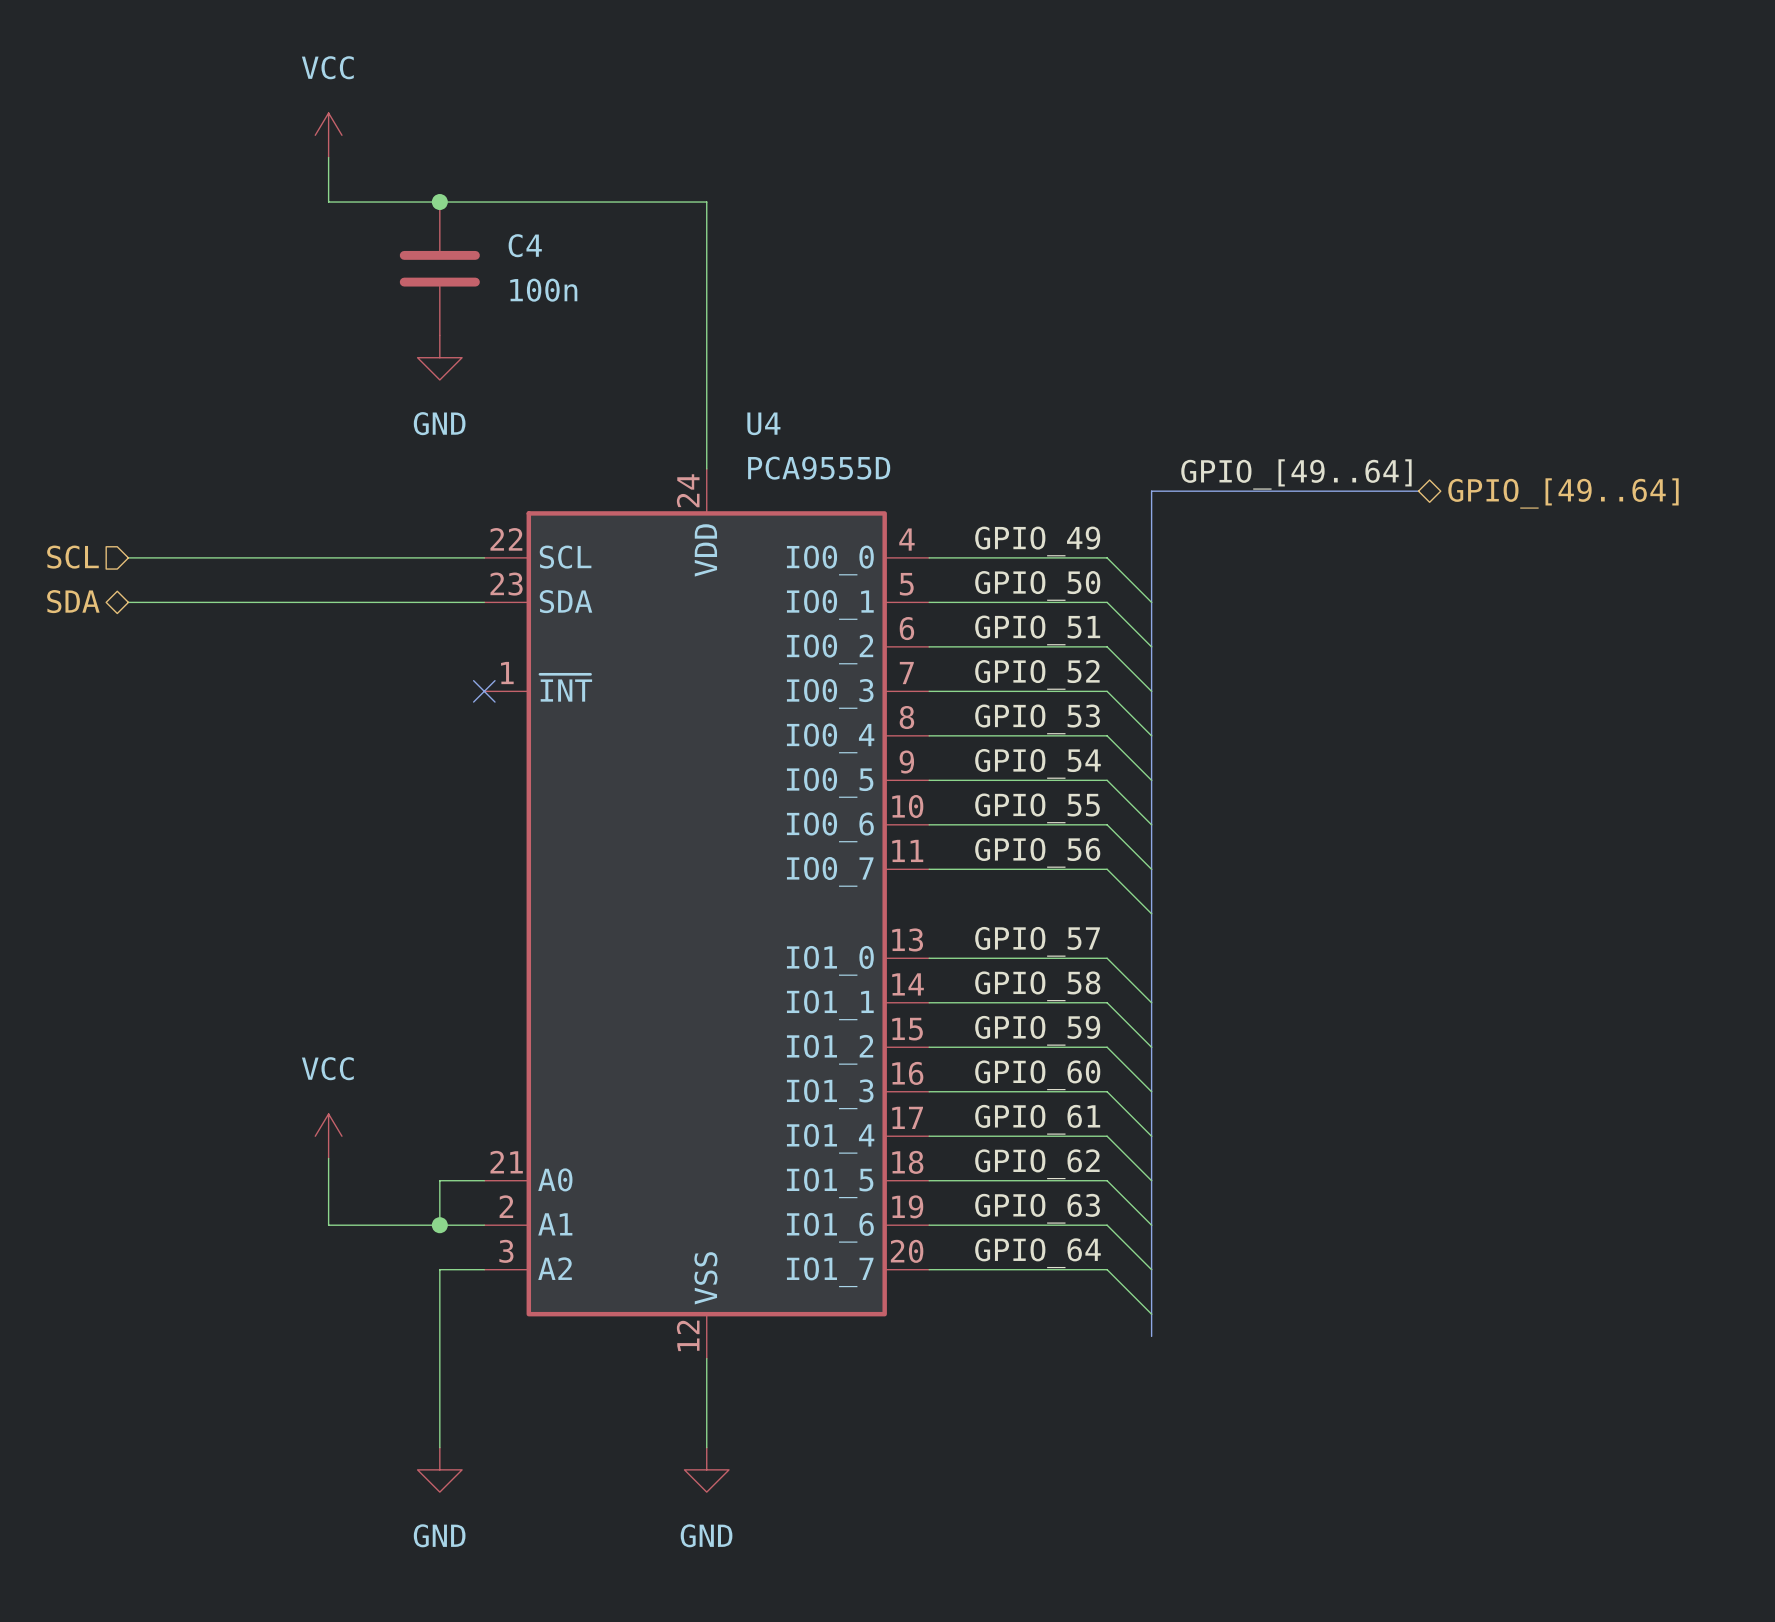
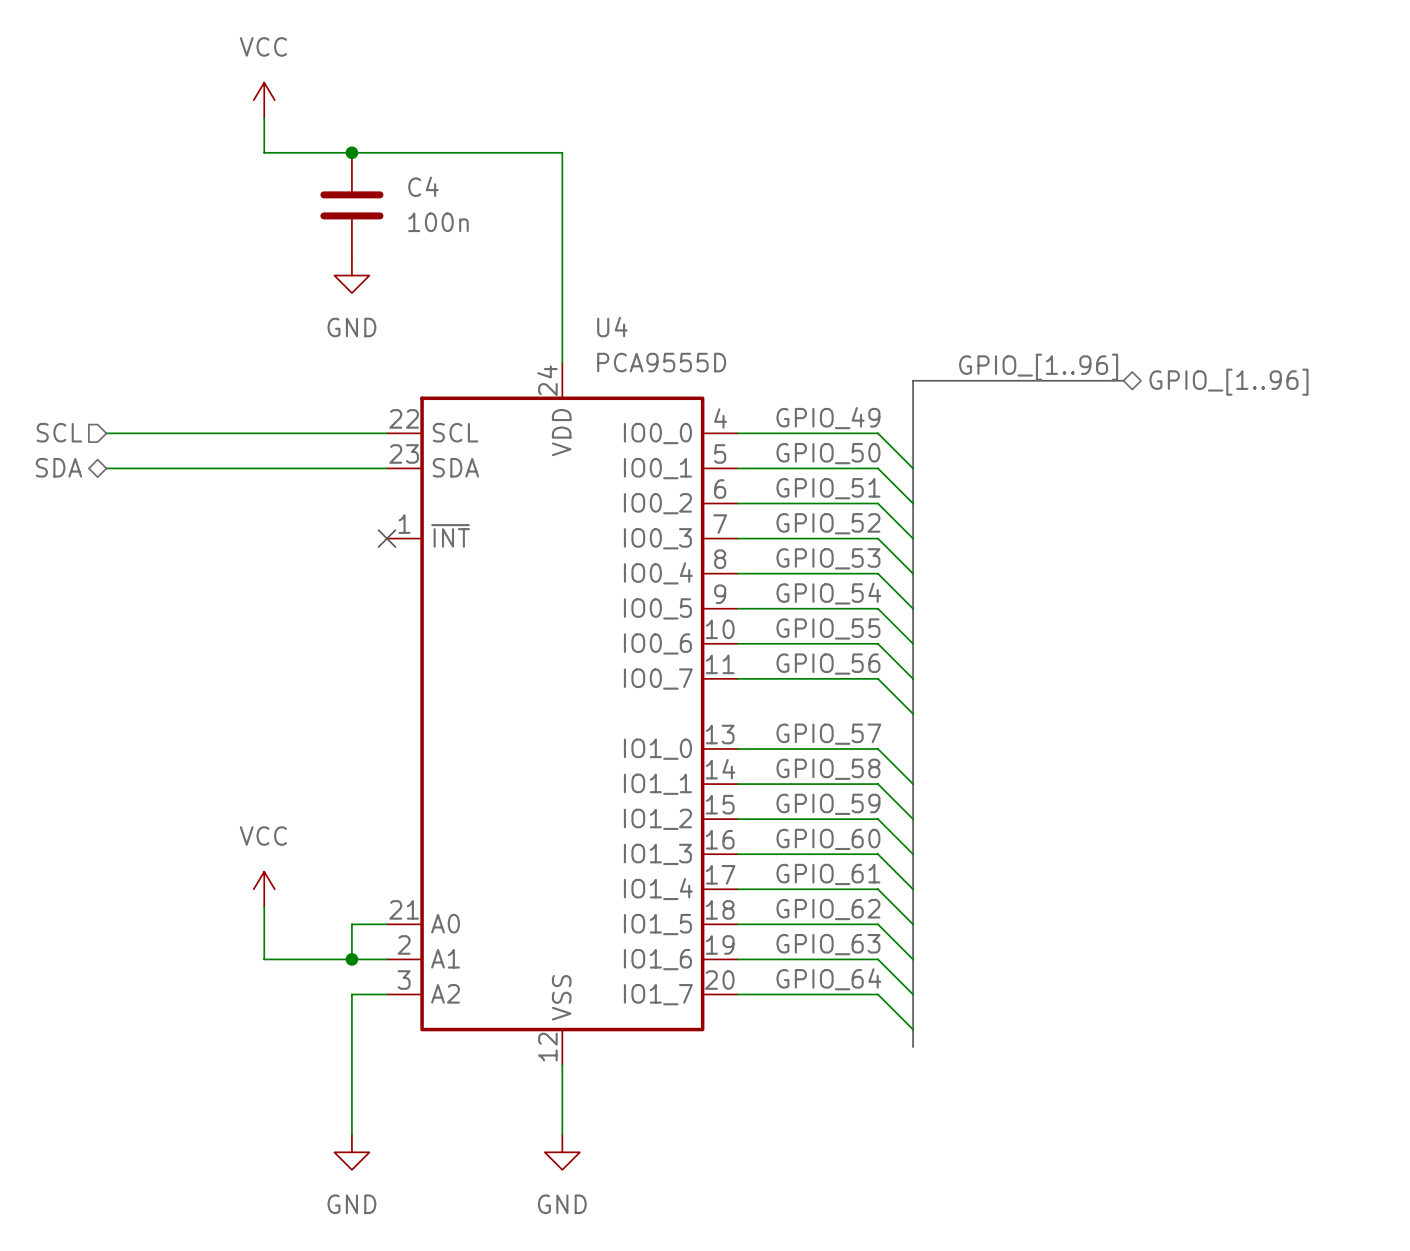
label: GPIO_[49..64] (1296, 474) -> GPIO_[1..96] (1038, 367)
hierarchical label: GPIO_[49..64] (1563, 493) -> GPIO_[1..96] (1228, 382)

